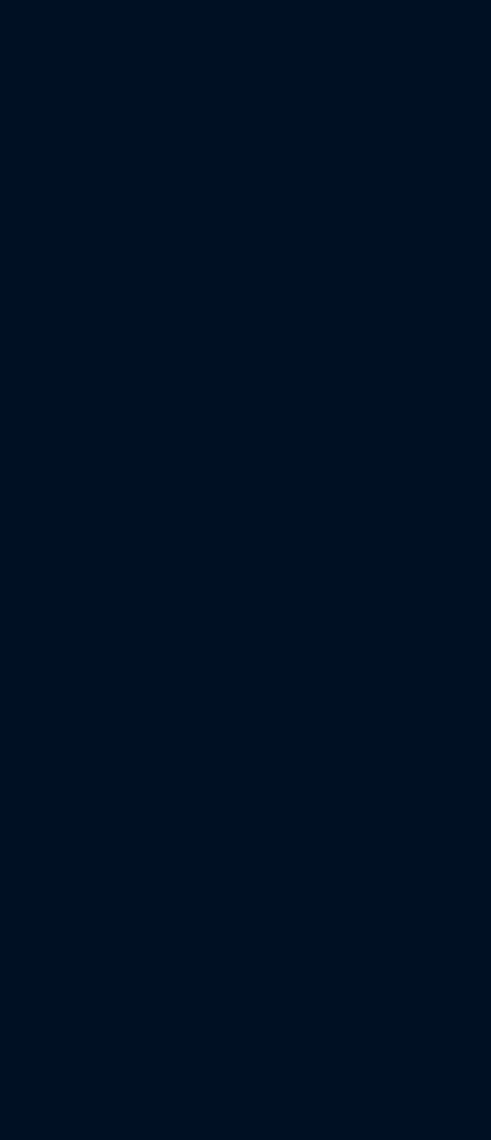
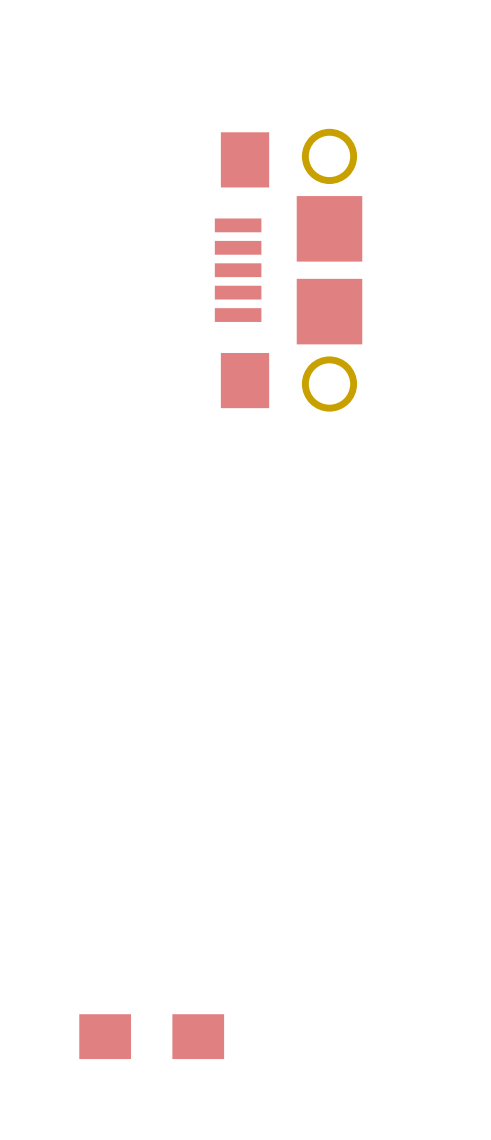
part: none -> (288, 270)
part: none -> (151, 1036)

